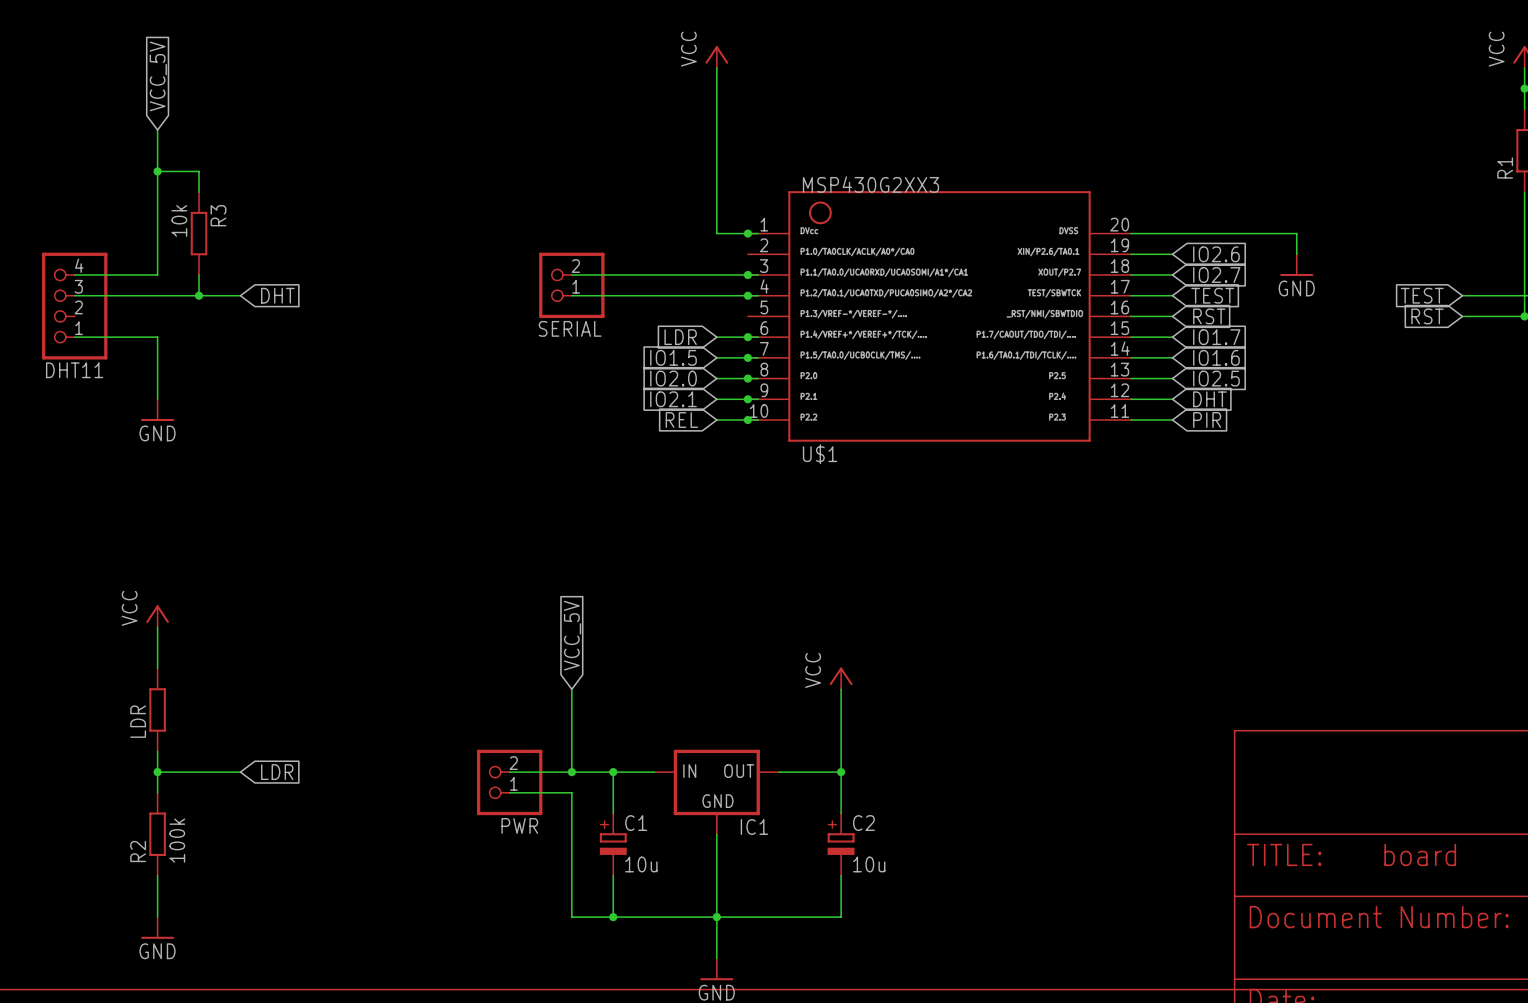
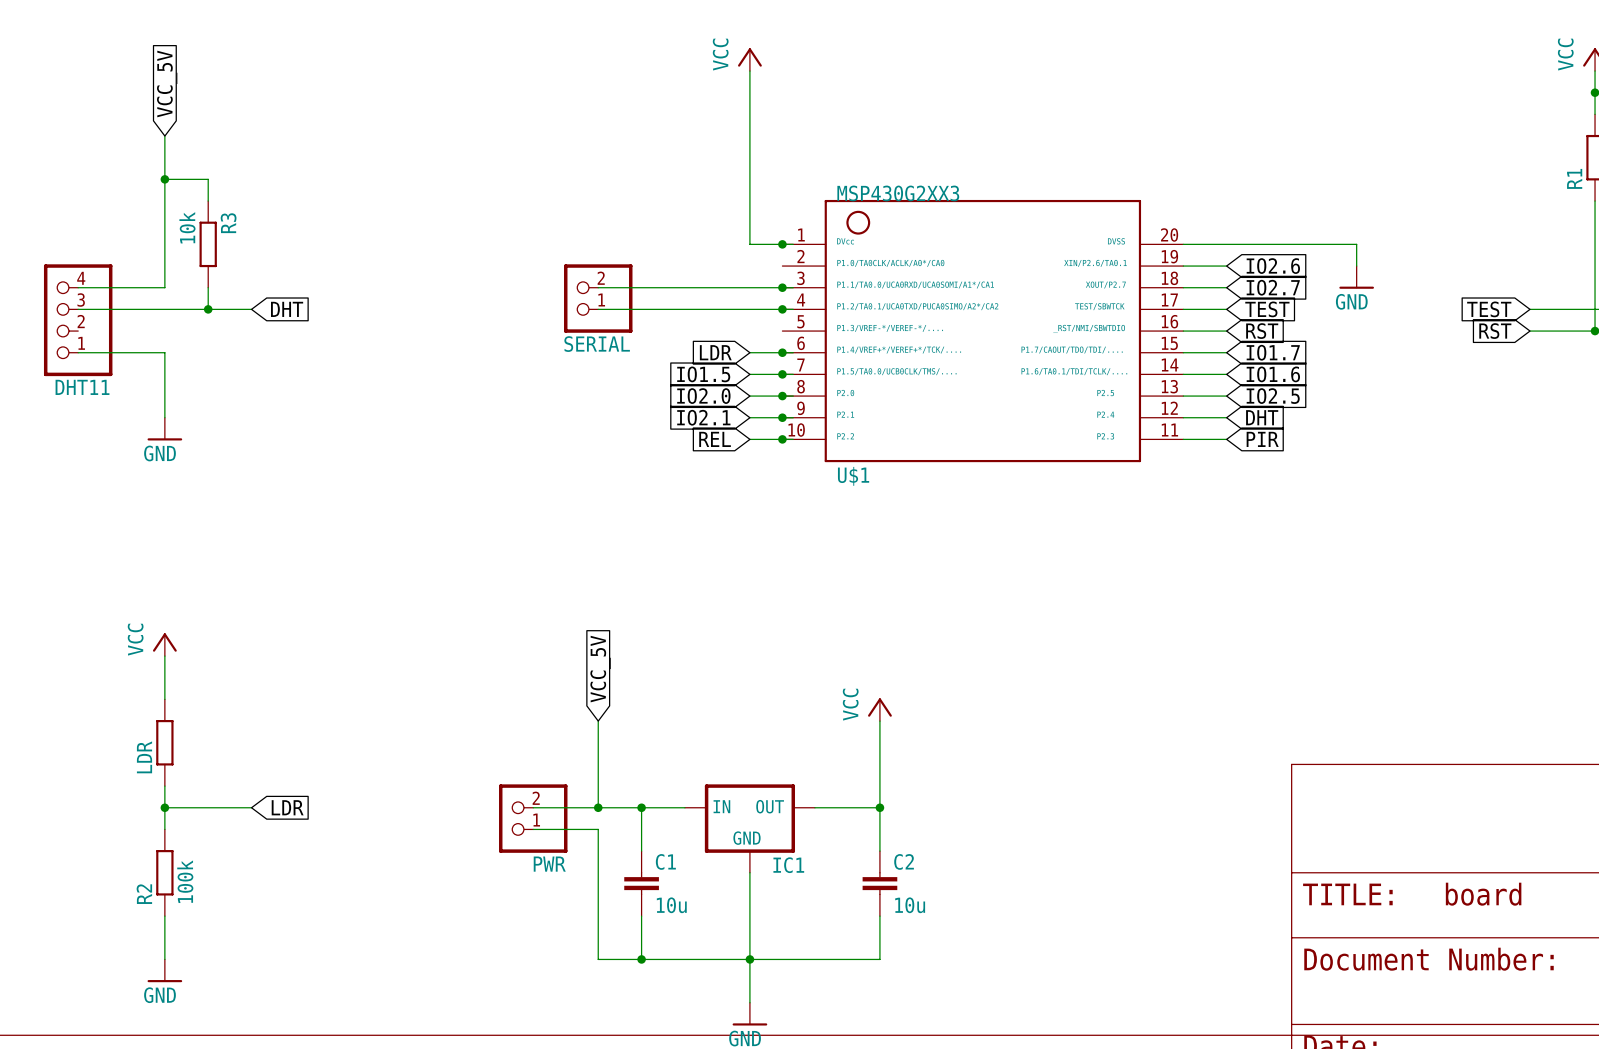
C1 symbol: [599, 813, 627, 876] -> [624, 851, 659, 917]
C2 symbol: [827, 813, 855, 876] -> [862, 851, 898, 917]

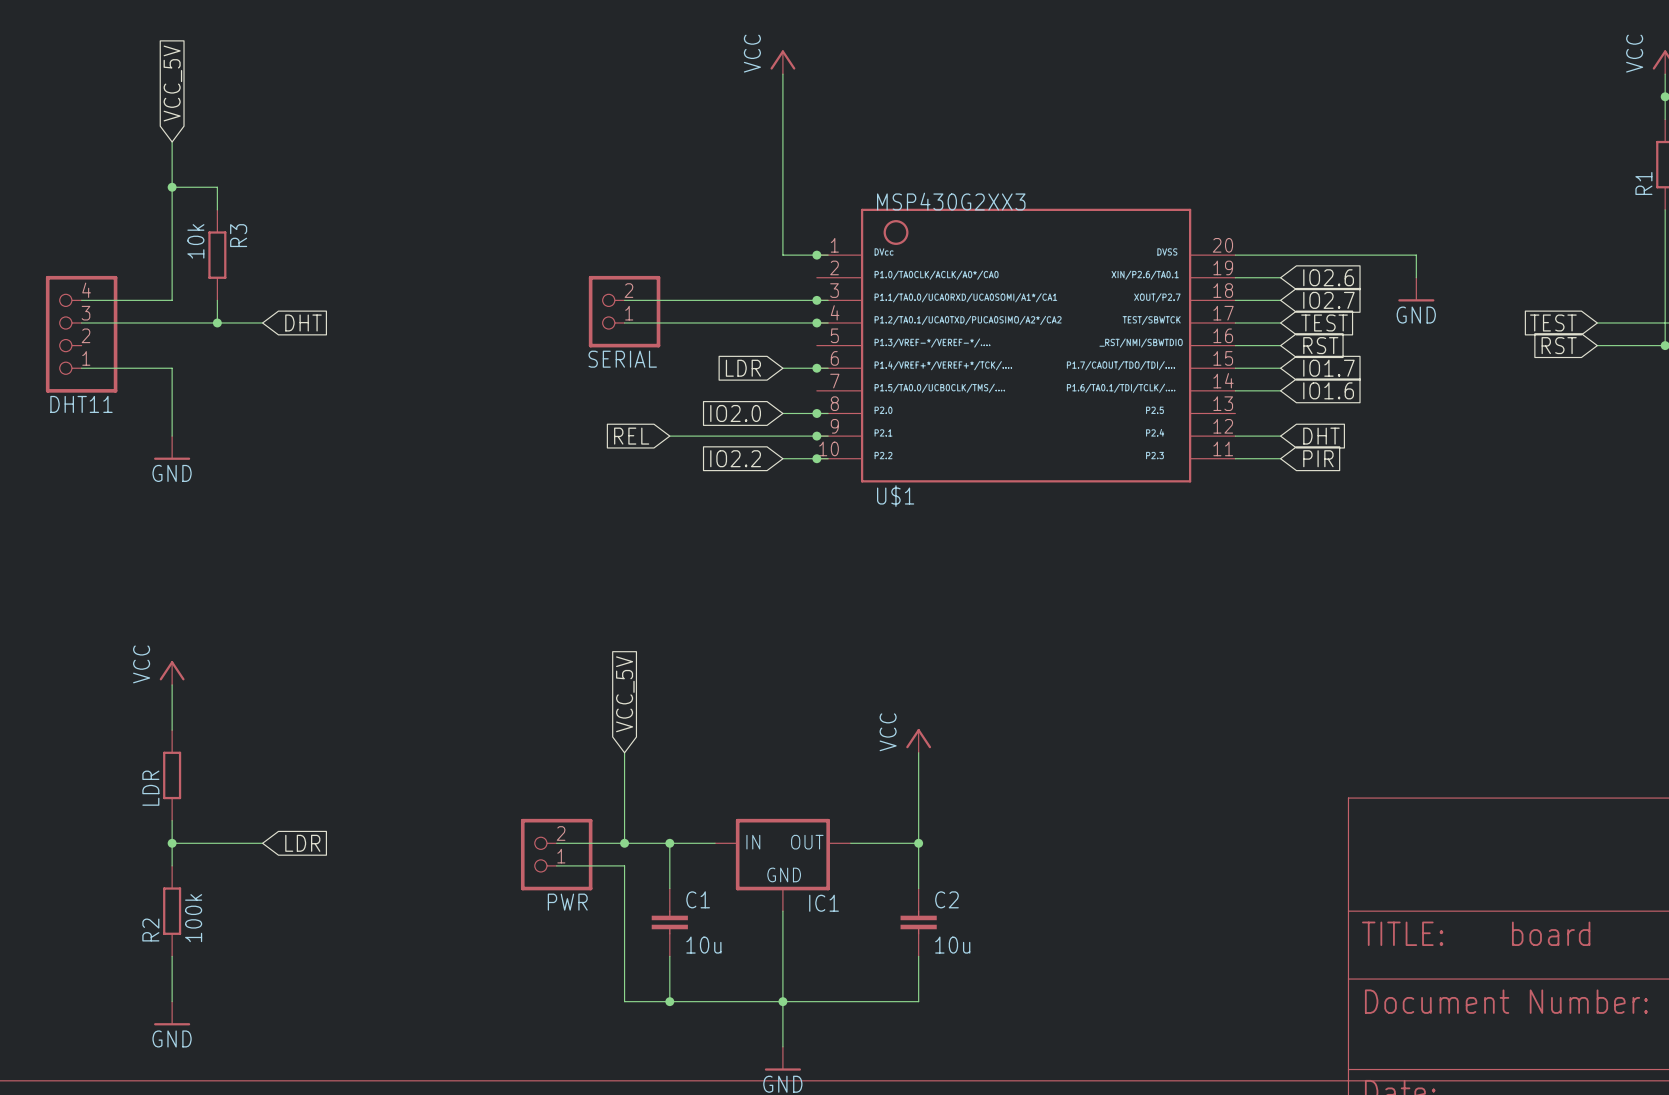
global label: IO1.5 (703, 374) -> none
wire: (749, 374) (793, 374) -> none
junction: (782, 374) -> none
wire: (1183, 396) (1226, 396) -> none
global label: IO2.5 (1273, 396) -> none
global label: none -> REL (631, 436)
wire: none -> (669, 436) (782, 436)
global label: IO2.1 (703, 417) -> none
global label: REL (715, 439) -> IO2.2 (735, 458)

